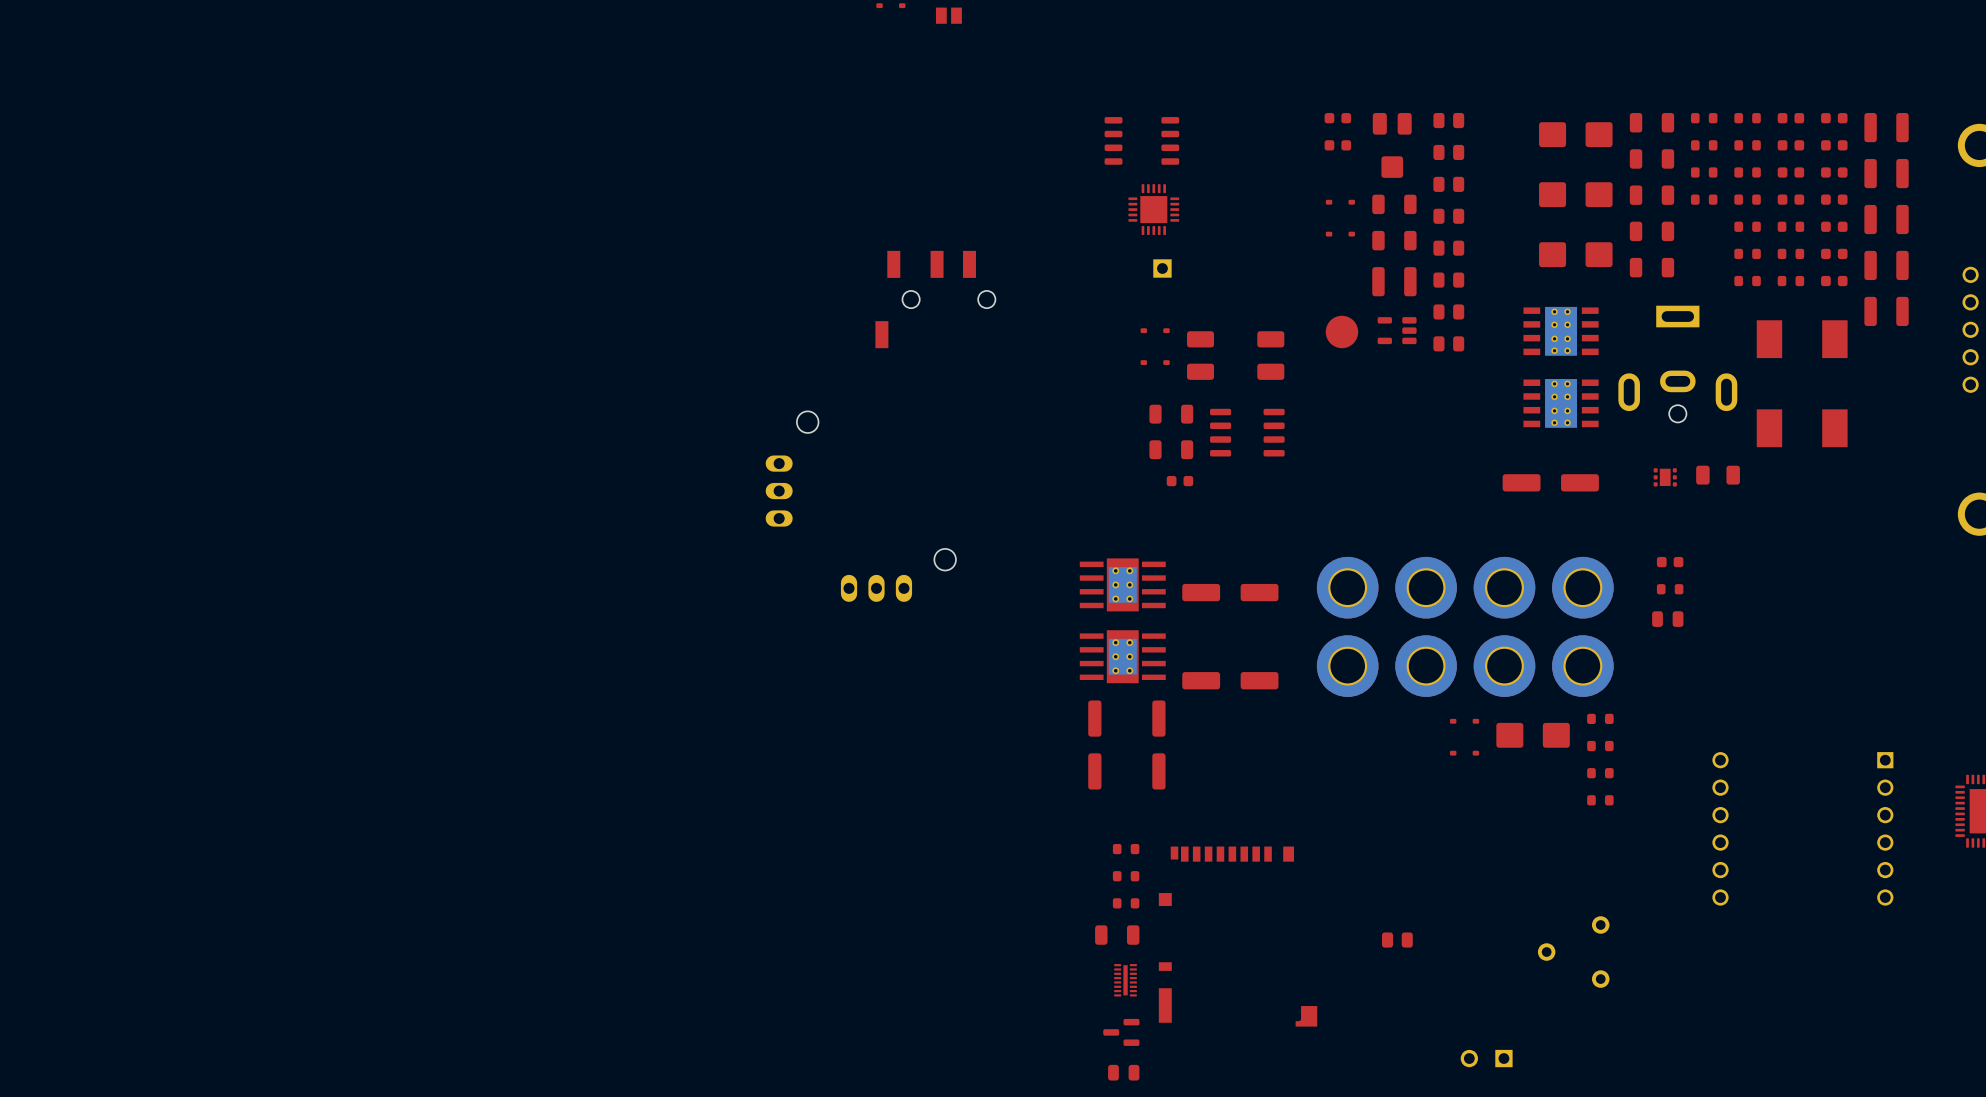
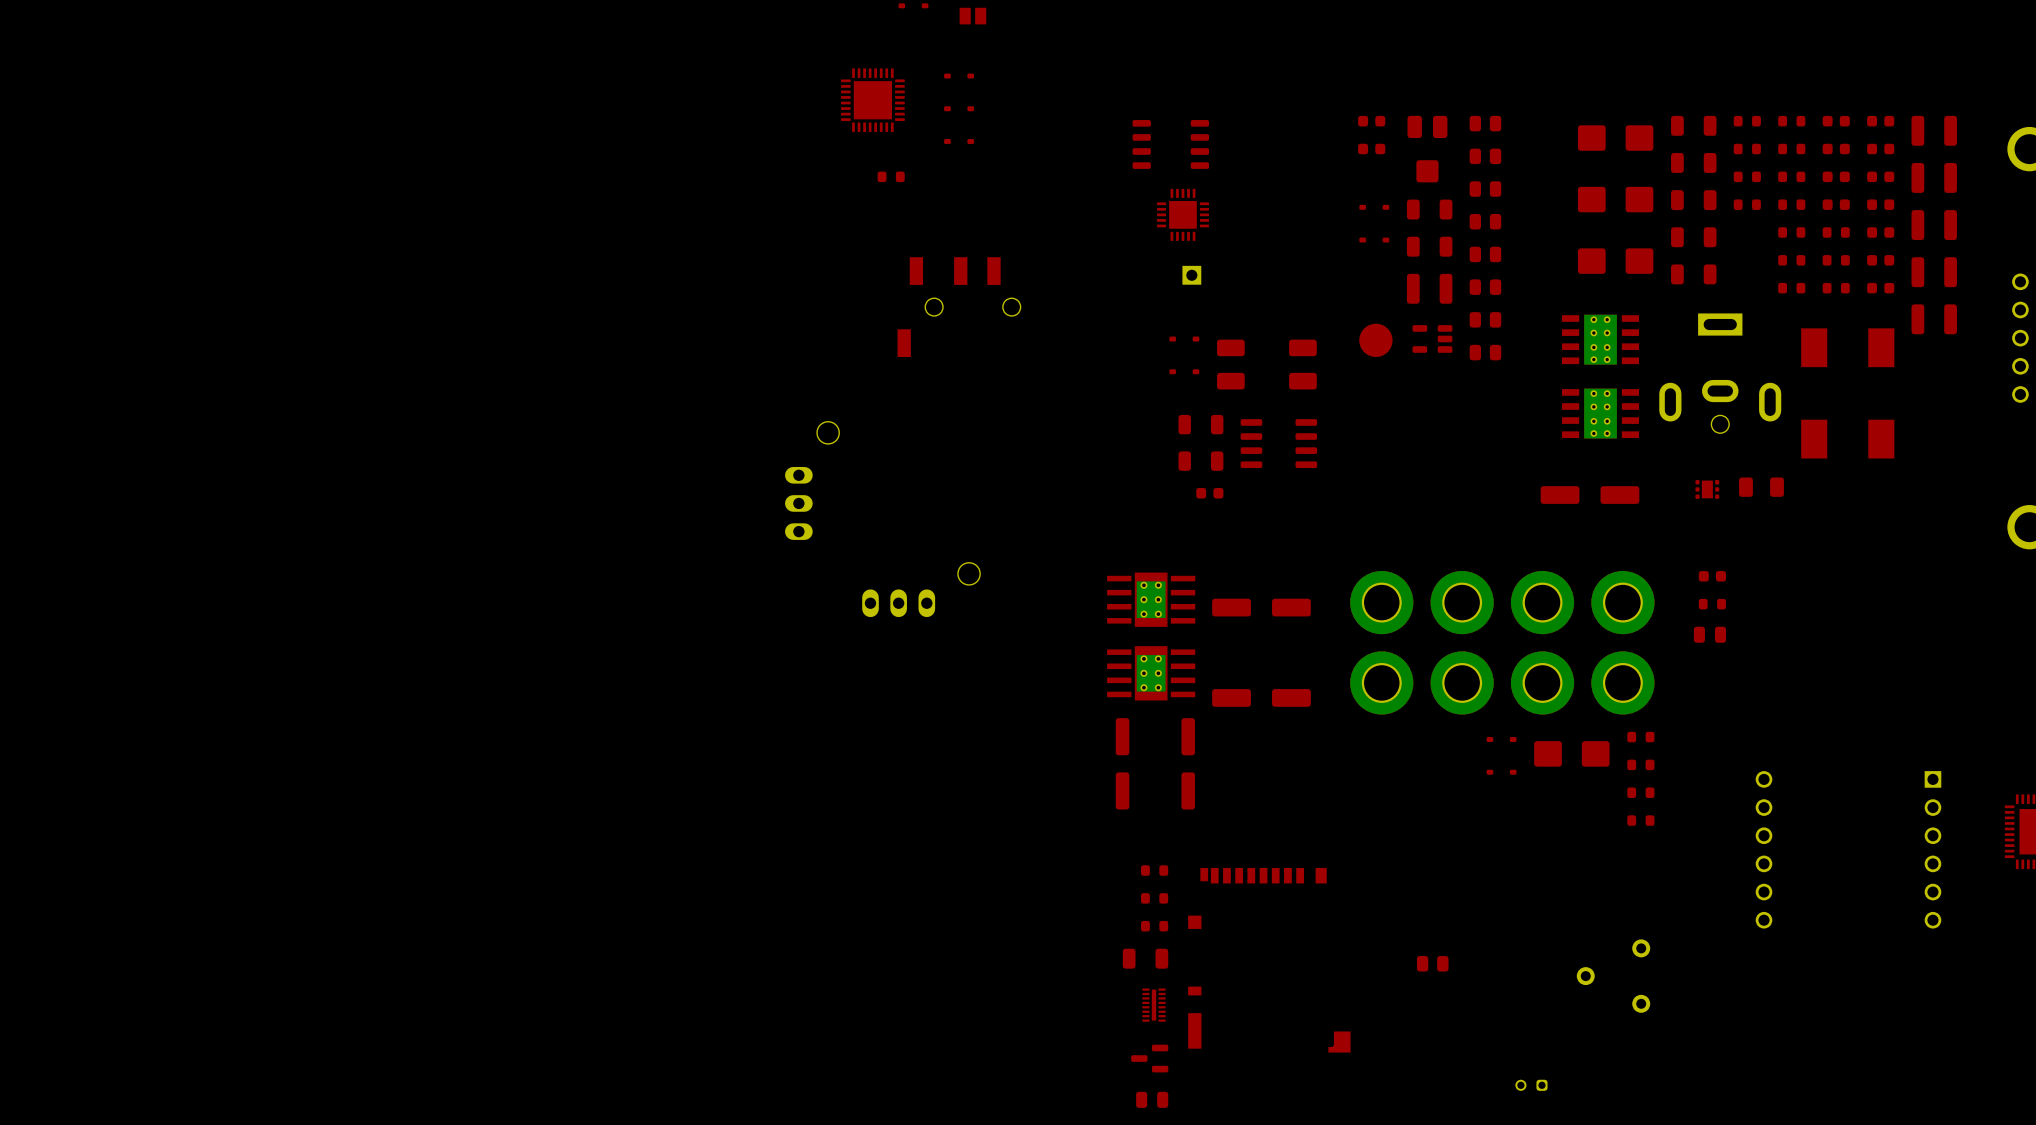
part: none -> (959, 76)
part: none -> (872, 100)
part: none -> (959, 108)
part: none -> (959, 141)
part: none -> (891, 176)
part footprint: [1460, 1049, 1513, 1068] -> [1515, 1079, 1548, 1091]

